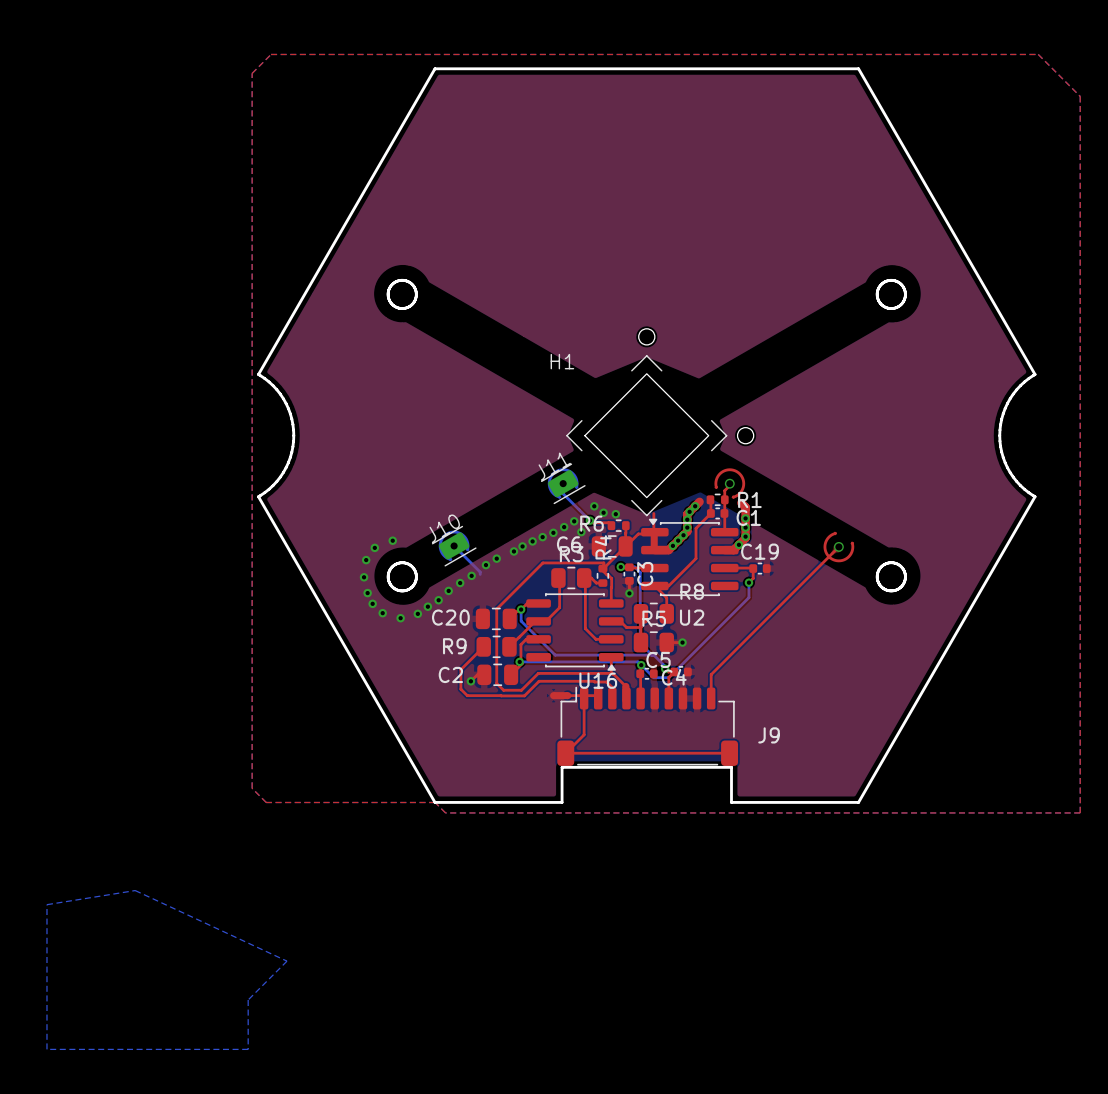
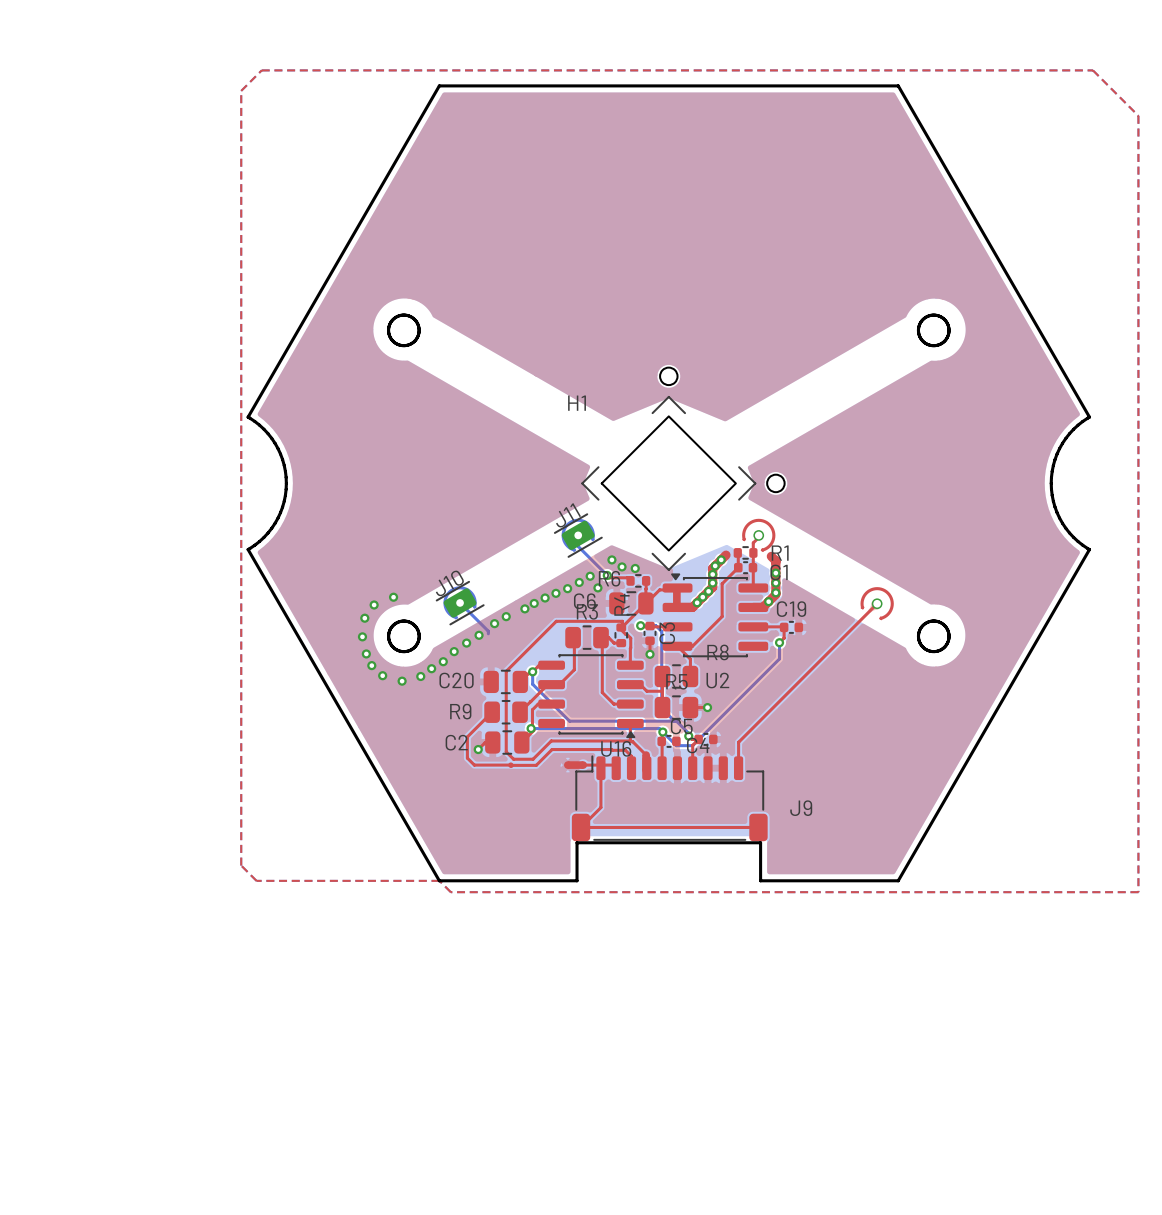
top track: (653, 513) (653, 531) -> none
part rotation: 0° (838, 546) -> 180° (877, 603)
bottom zone outline: (135, 890) (287, 961) (248, 999) (248, 1049) (46, 1049) (46, 904) (135, 890) -> none

